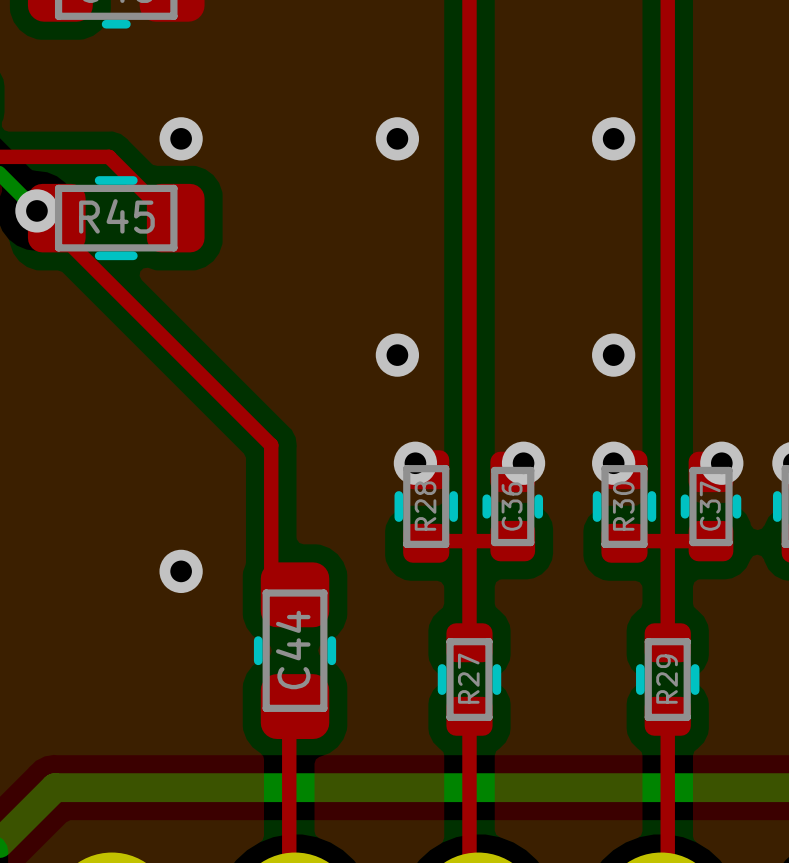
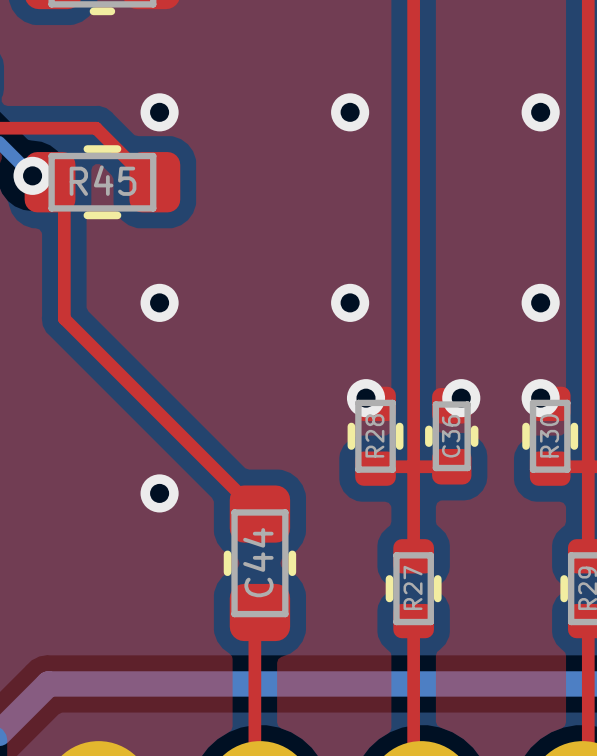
top track: (72, 246) (271, 445) (271, 571) -> (64, 207) (64, 318) (238, 493)
via: none -> (159, 302)

